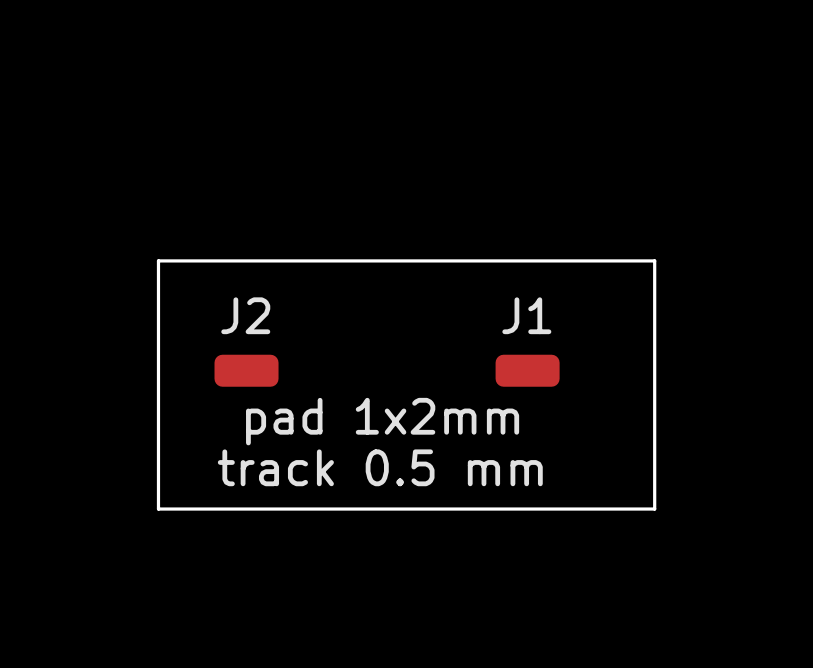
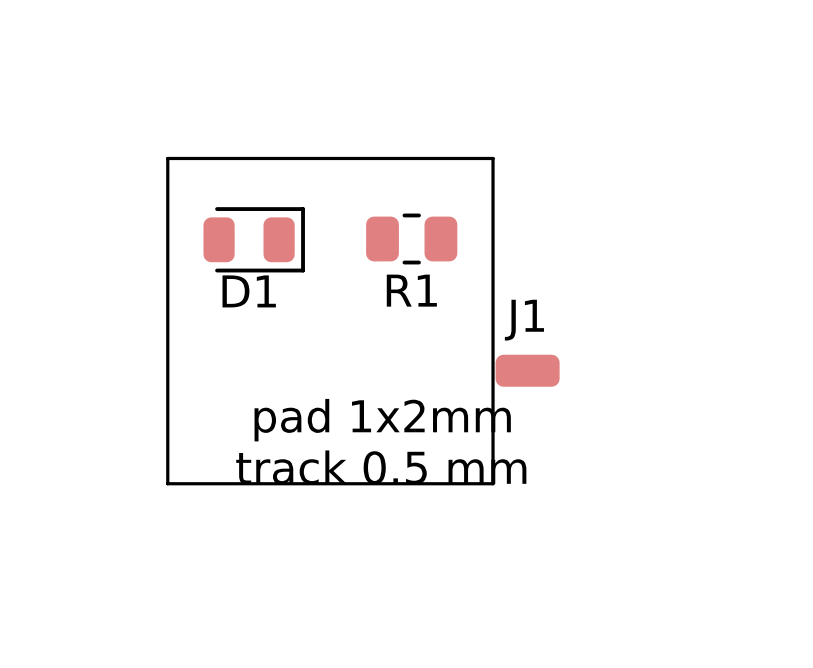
board edge: none -> (167, 158) (493, 158) (493, 483) (167, 483) (167, 158)
R1: none -> (411, 238)
D1: none -> (254, 239)
board edge: (158, 260) (654, 260) (654, 509) (158, 509) (158, 260) -> none
J2: (246, 370) -> none

